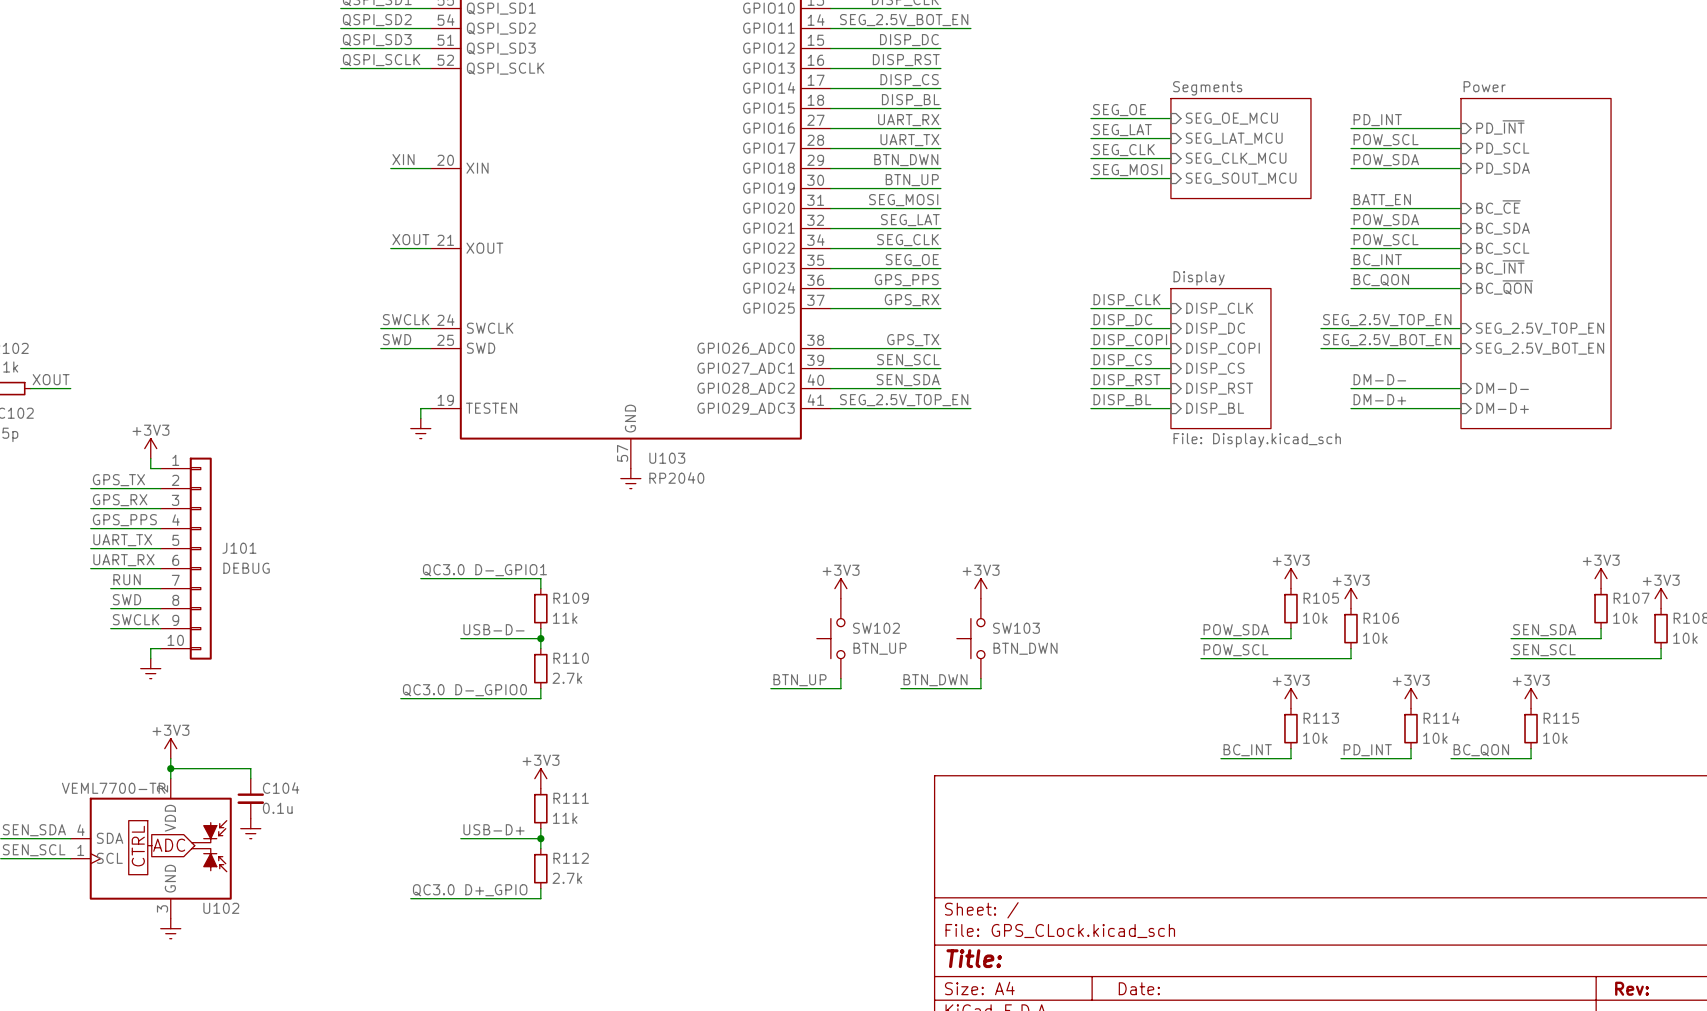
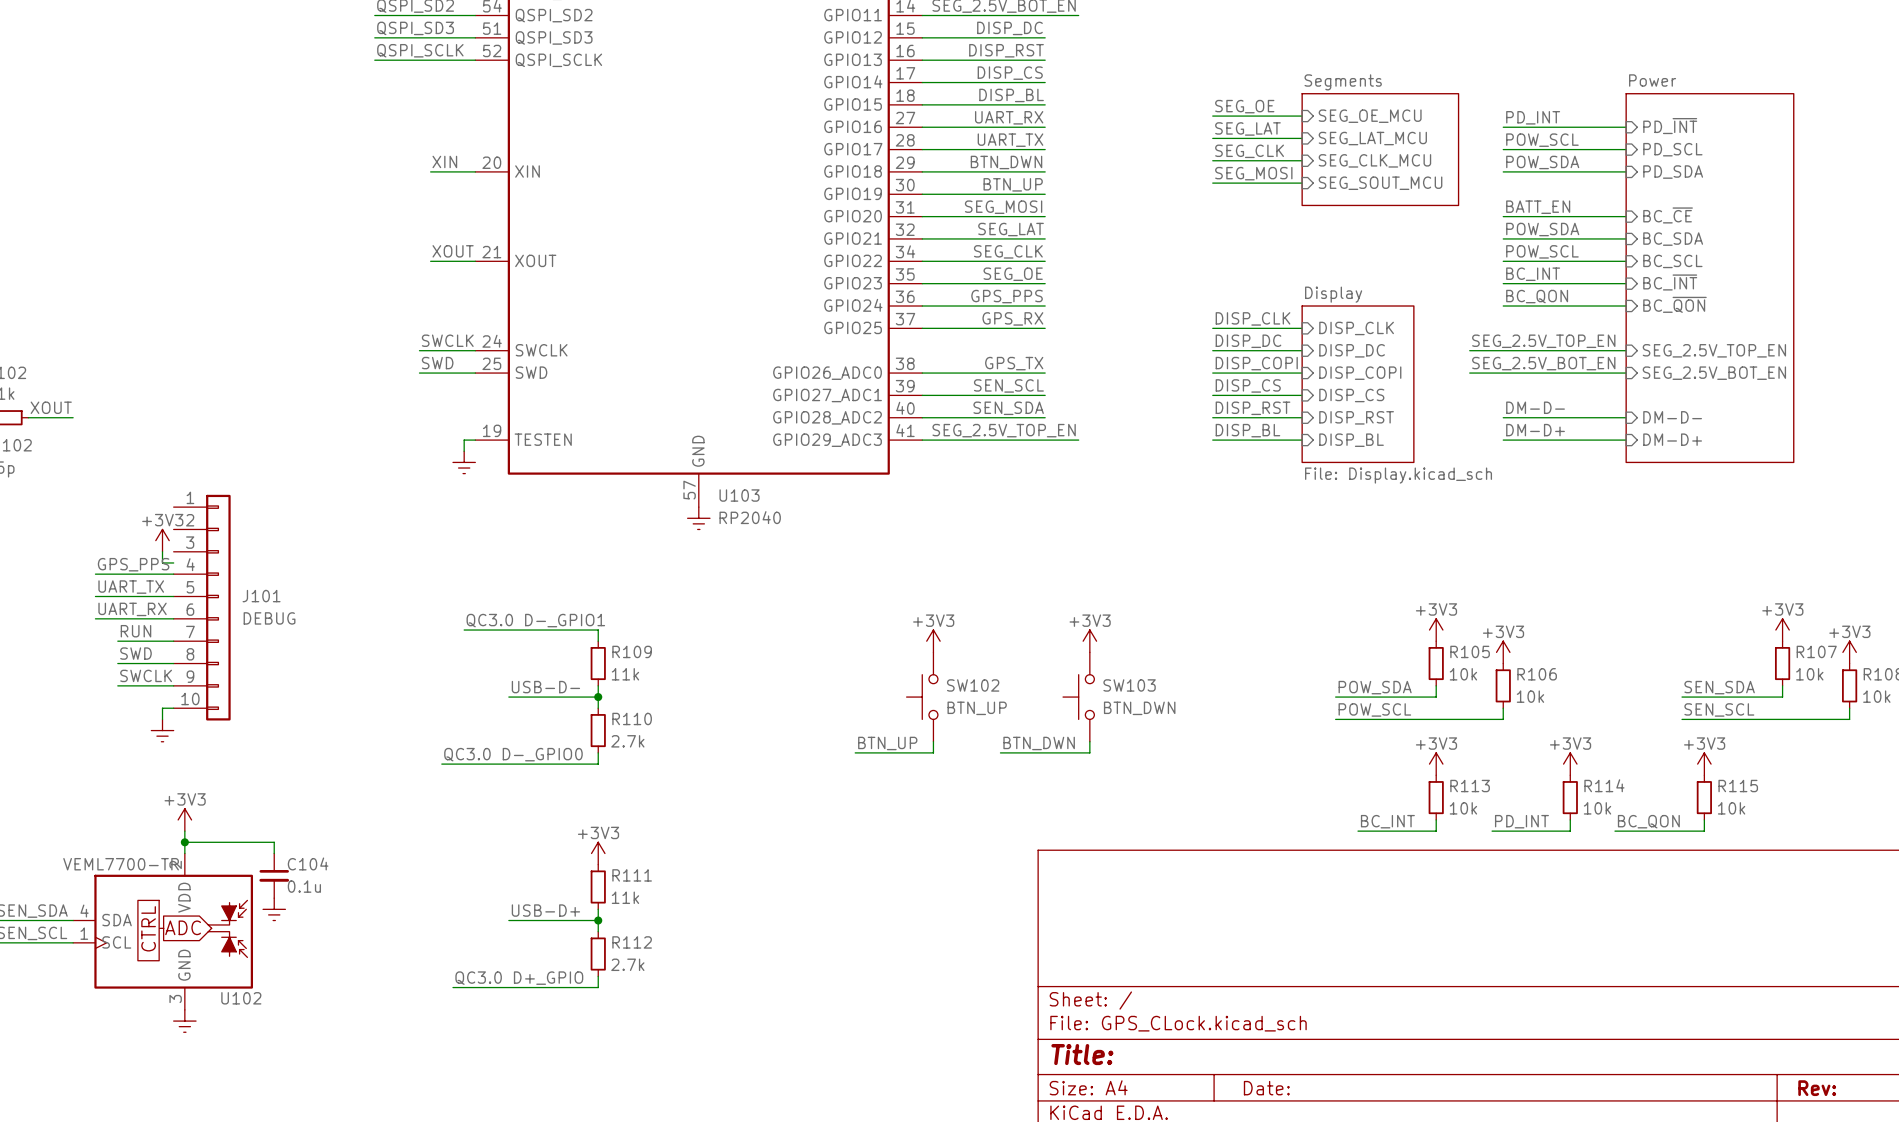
power symbol position: +3V3 (150, 448) -> +3V3 (162, 540)
wire: (150, 458) (150, 468) (160, 468) -> (162, 551) (162, 562) (173, 562)
label: GPS_TX (118, 480) -> none
wire: (90, 488) (160, 488) -> none
label: GPS_RX (120, 500) -> none
wire: (90, 508) (160, 508) -> none

